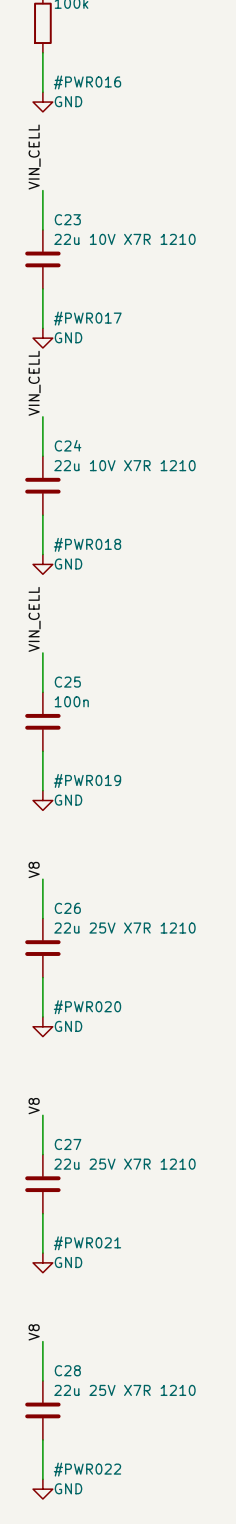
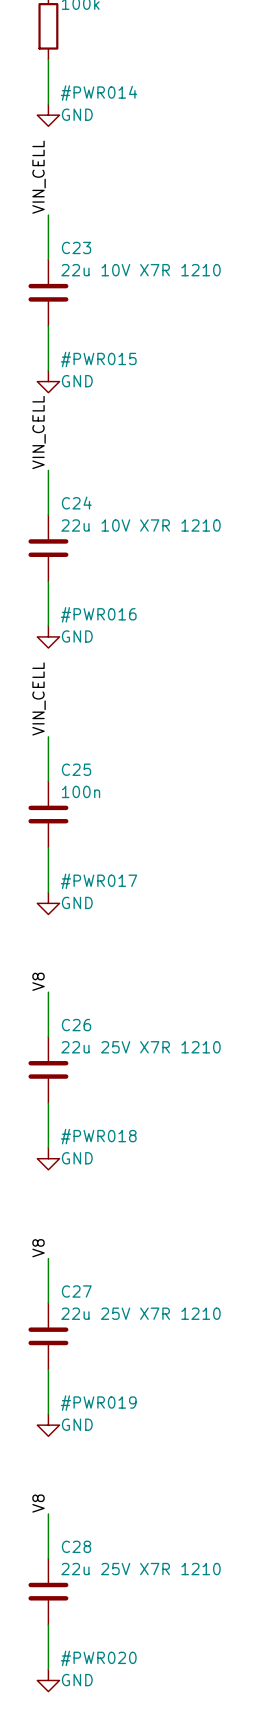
#PWR016 name: #PWR016 (87, 82) -> #PWR014 (98, 93)
#PWR017 name: #PWR017 (87, 318) -> #PWR015 (98, 359)
#PWR018 name: #PWR018 (87, 544) -> #PWR016 (98, 614)
#PWR019 name: #PWR019 (87, 780) -> #PWR017 (98, 881)
#PWR020 name: #PWR020 (87, 1007) -> #PWR018 (98, 1136)
#PWR021 name: #PWR021 (87, 1243) -> #PWR019 (98, 1403)
#PWR022 name: #PWR022 (87, 1469) -> #PWR020 (98, 1658)

